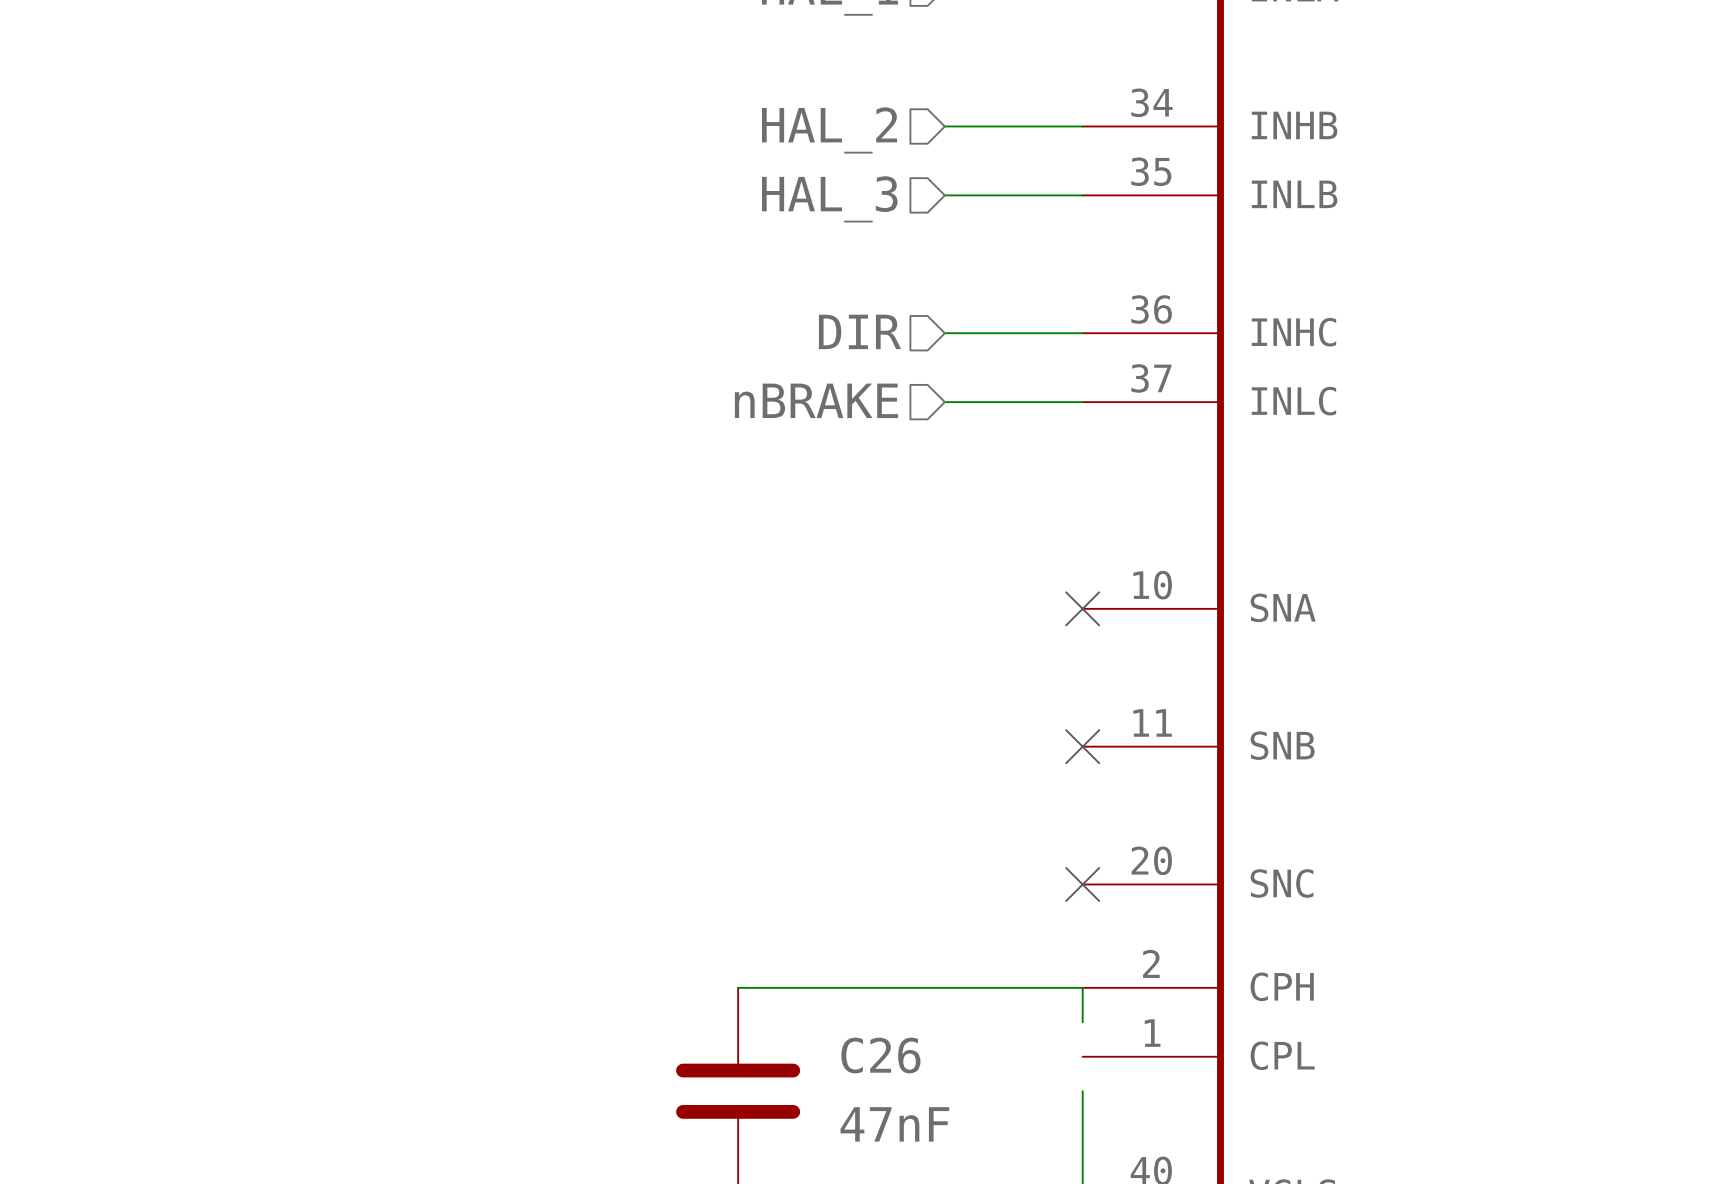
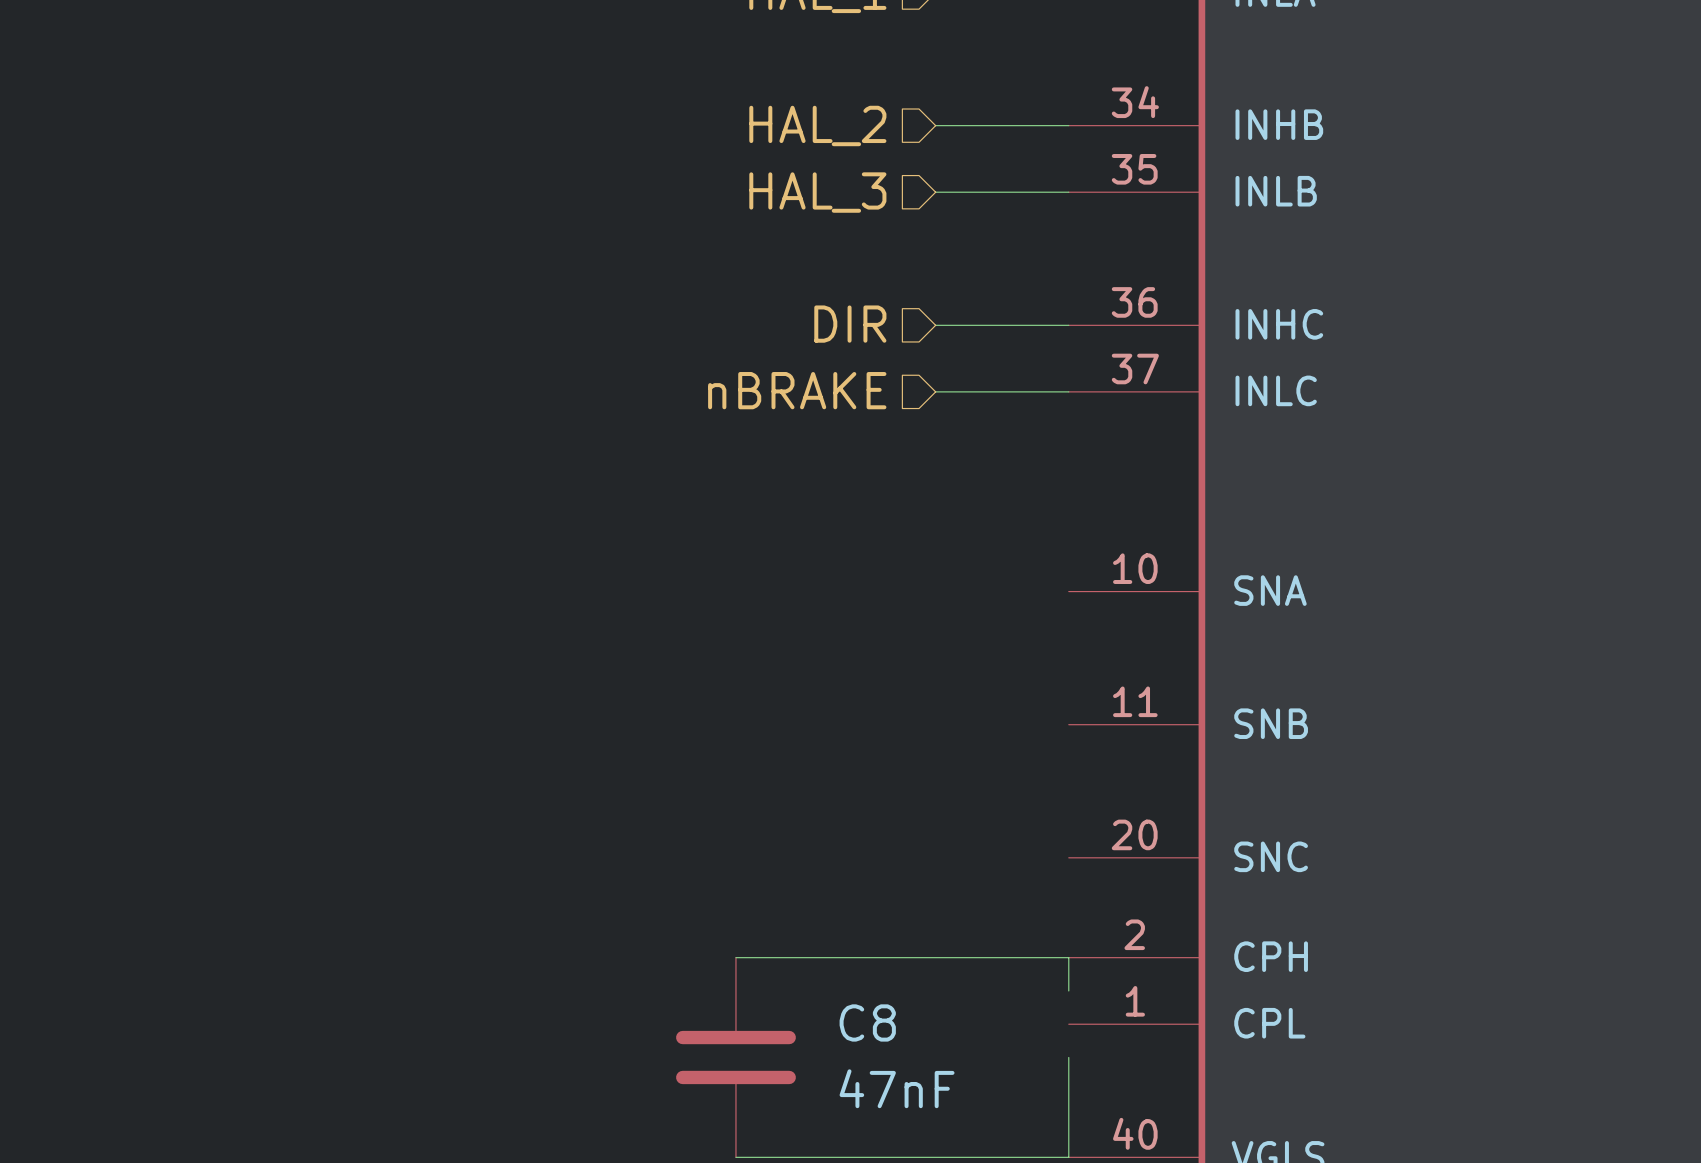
no-connect mark: (1082, 608) -> none
no-connect mark: (1082, 746) -> none
no-connect mark: (1082, 884) -> none
C26 name: C26 (880, 1055) -> C8 (867, 1022)

